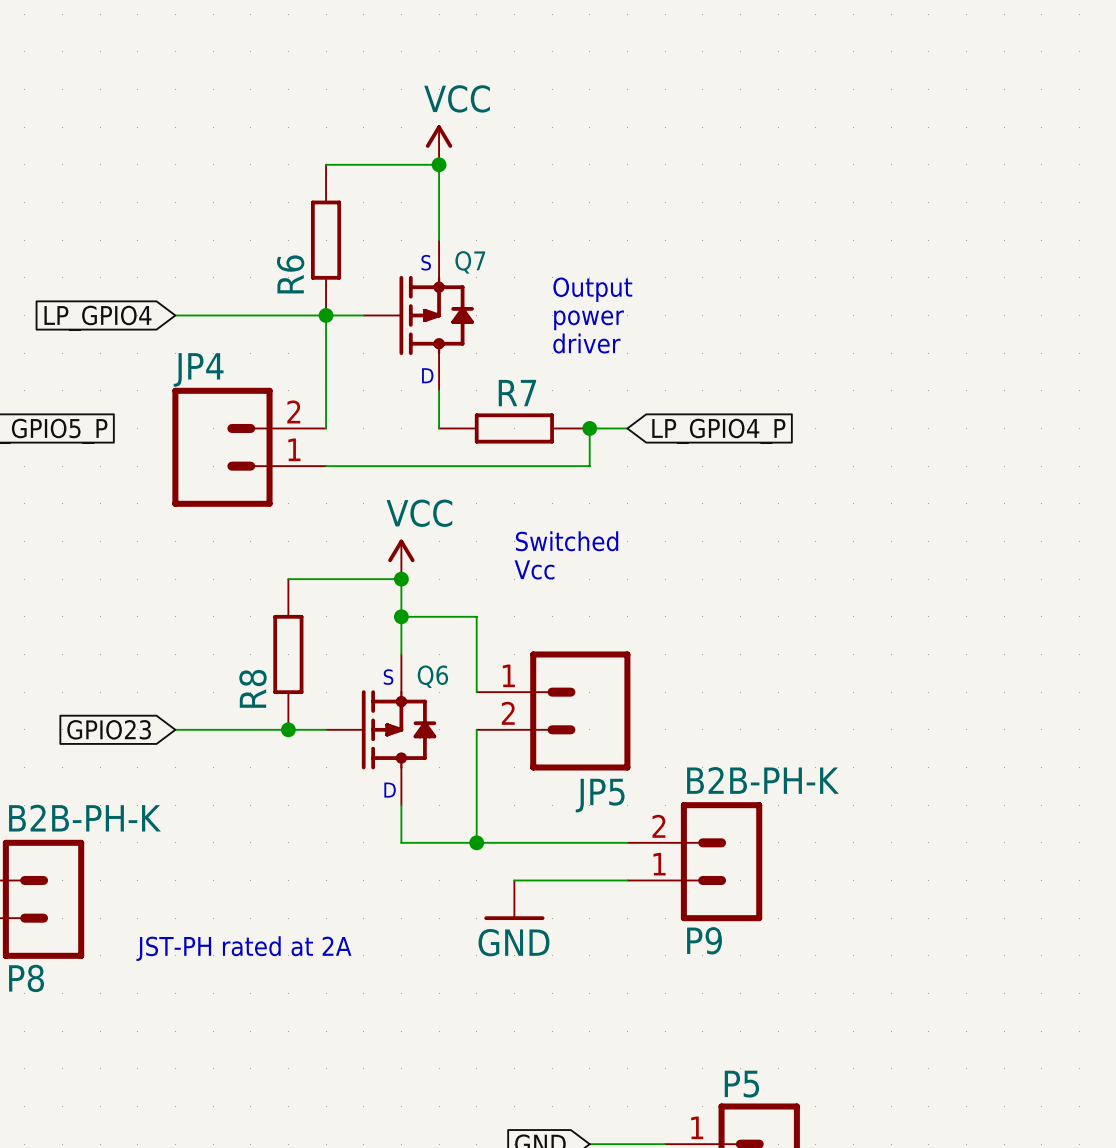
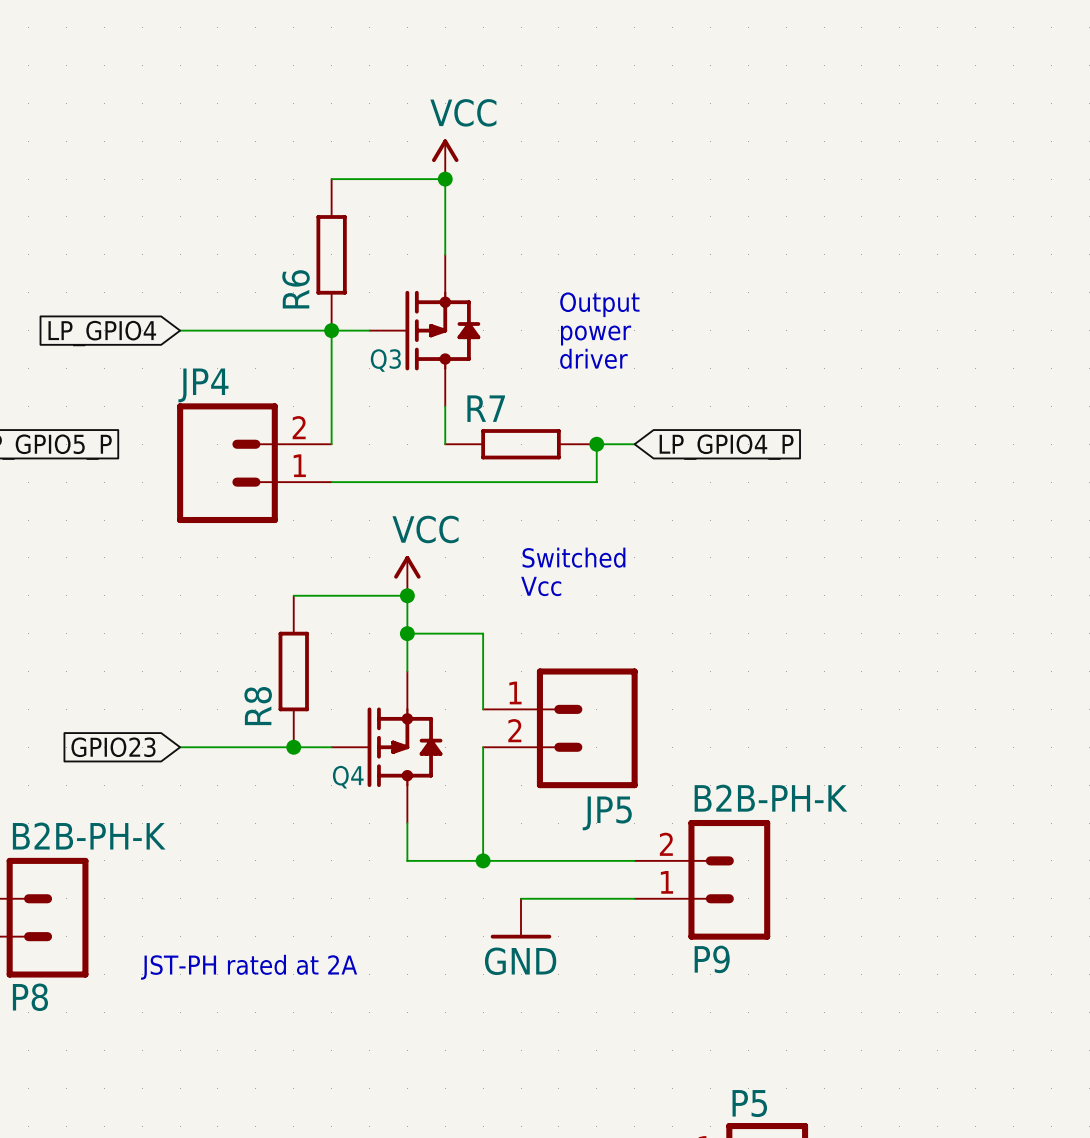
Q7 text: S (426, 262) -> none
Q7 name: Q7 (470, 262) -> Q3 (385, 360)
Q7 text: D (427, 375) -> none
R7 name position: R7 (517, 393) -> R7 (486, 408)
Q6 name: Q6 (432, 676) -> Q4 (348, 777)
Q6 text: S (388, 677) -> none
Q6 text: D (390, 790) -> none

